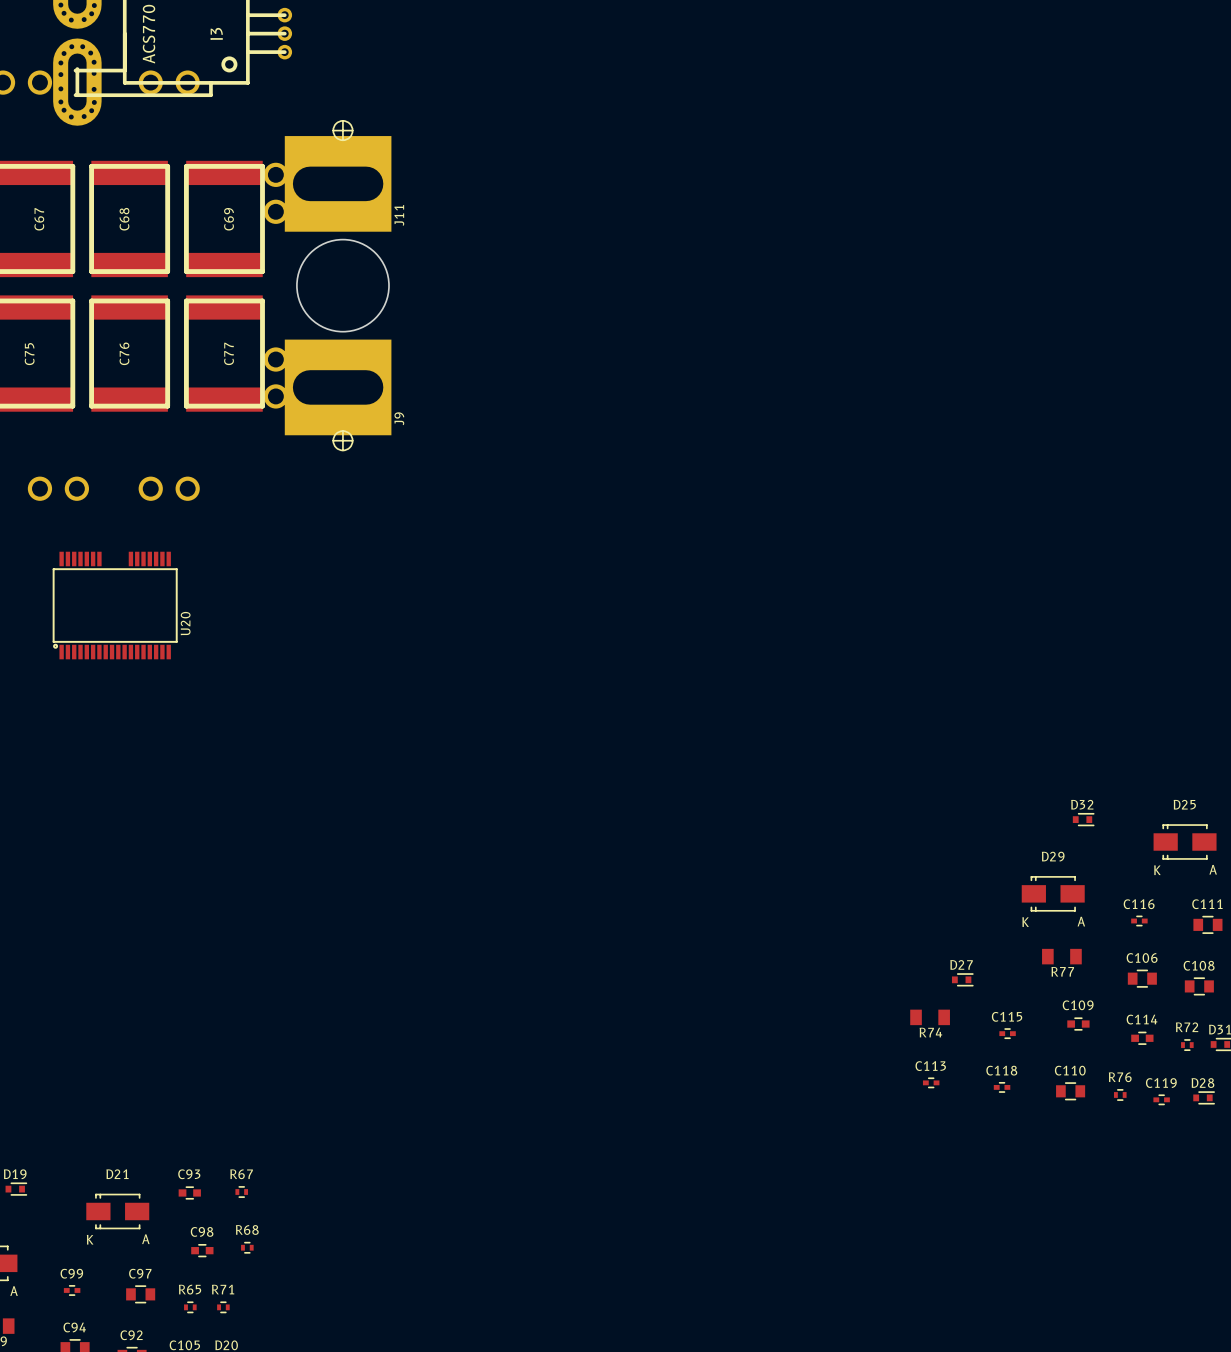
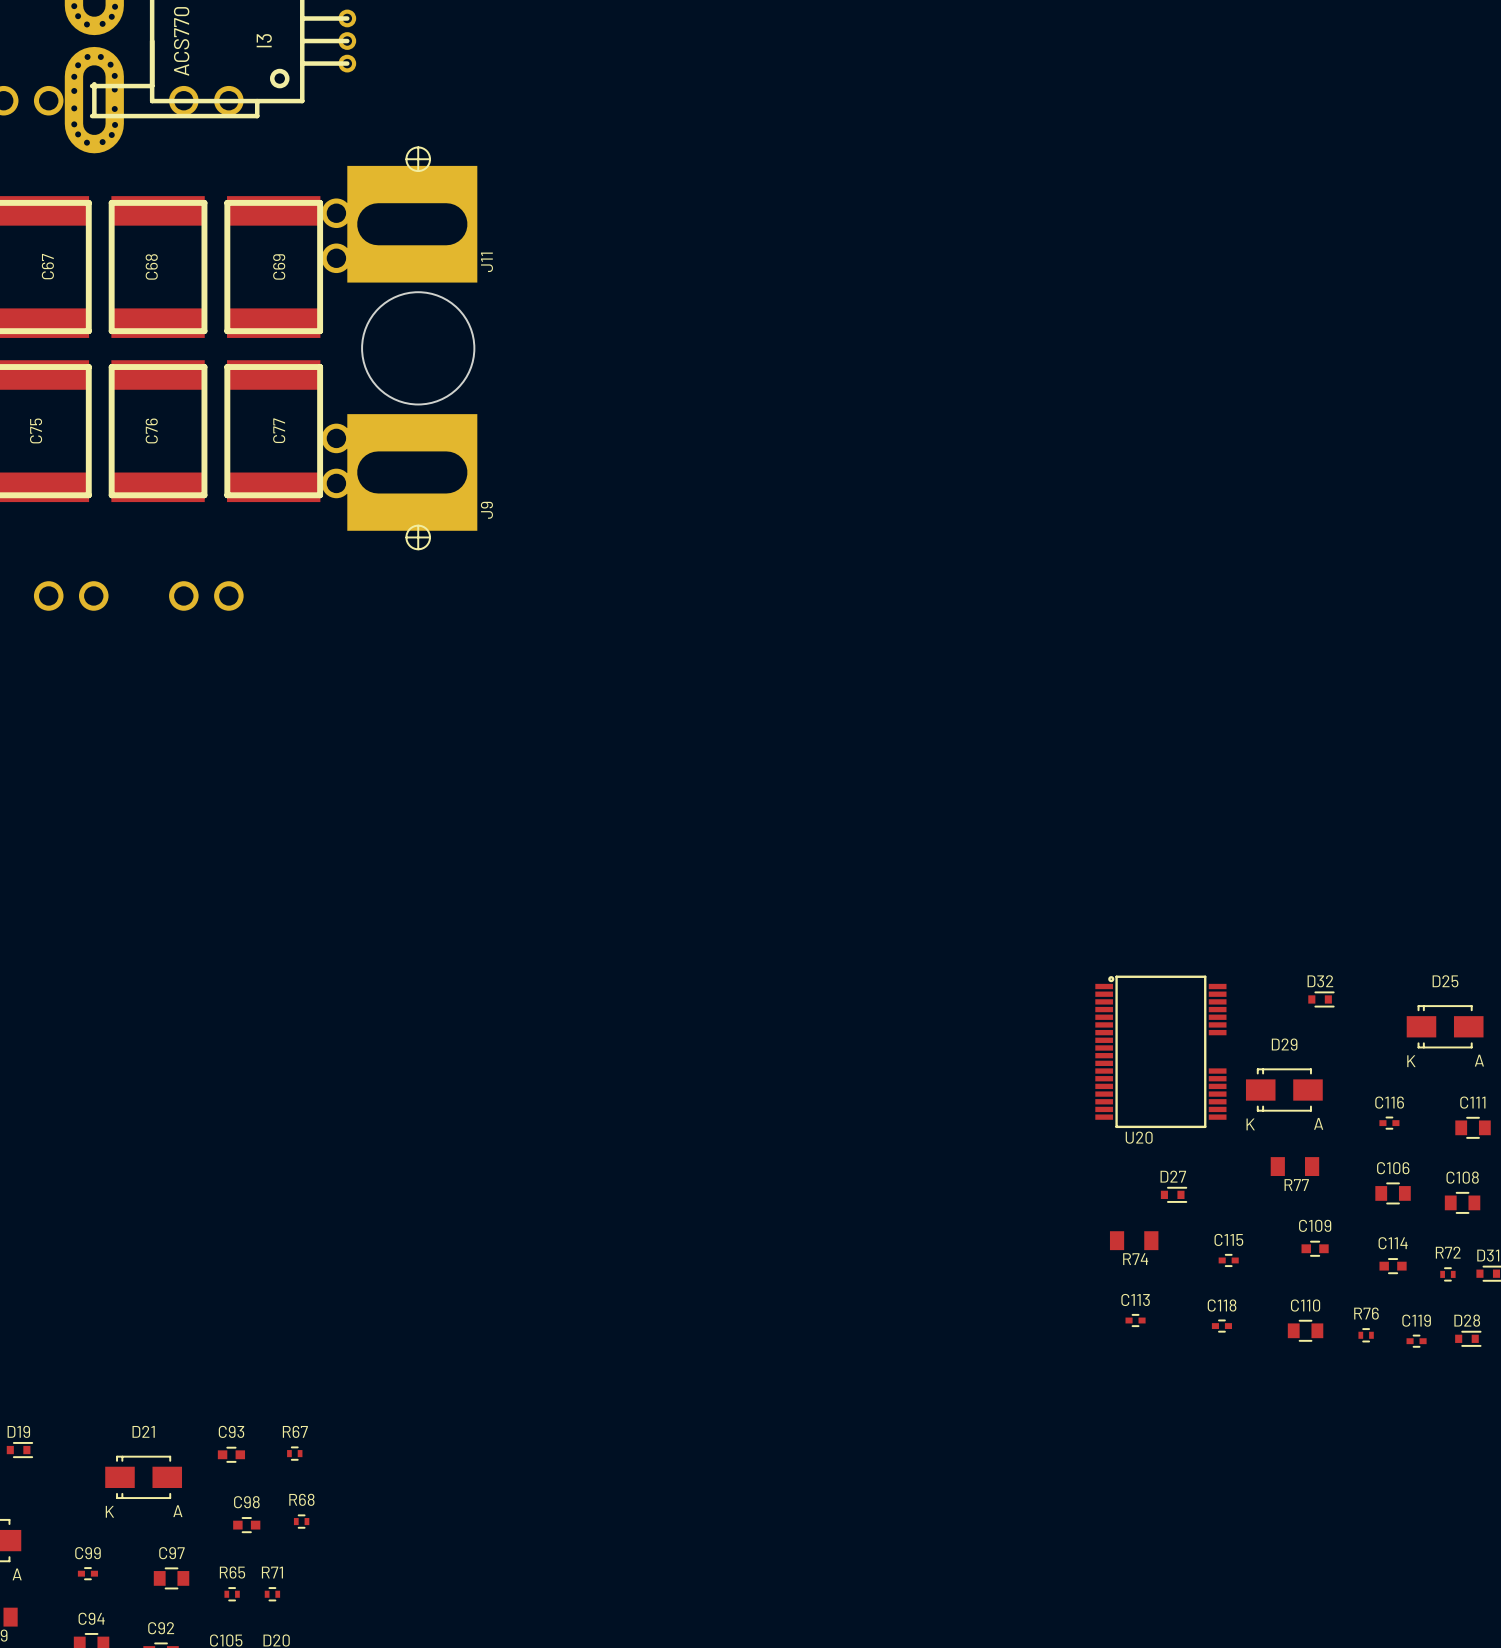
U20 rotation: 0° (115, 605) -> 90° clockwise (1160, 1051)
U20 position: (115, 605) -> (1160, 1051)

